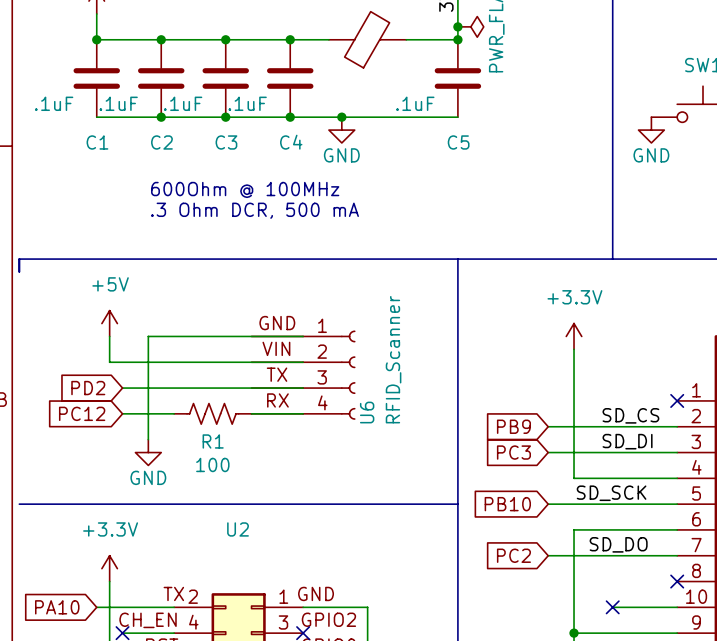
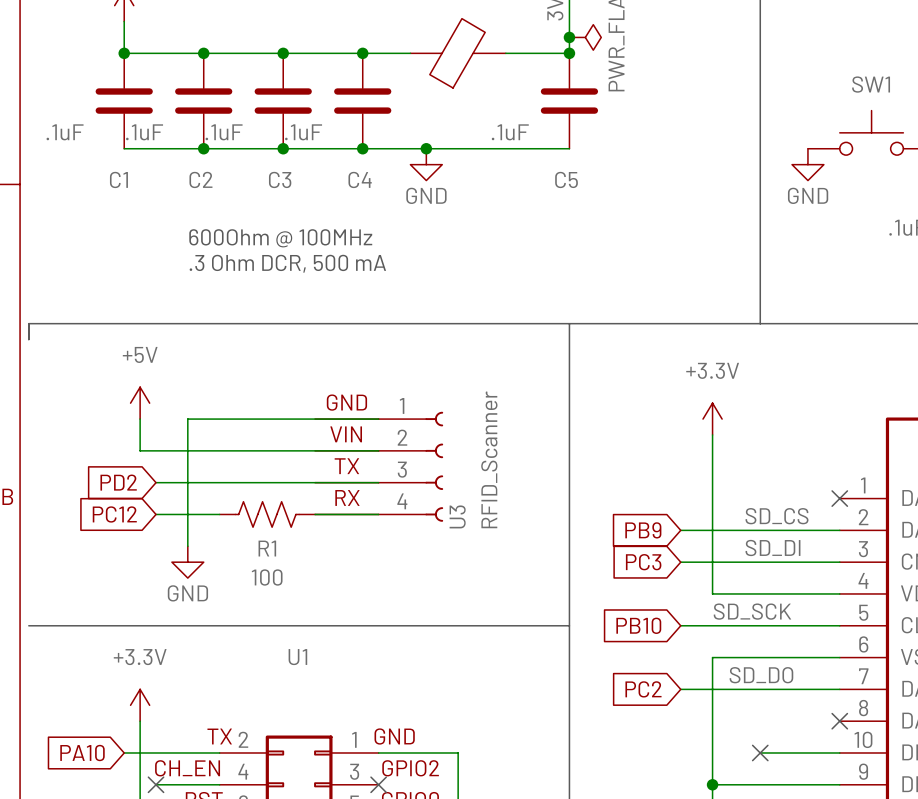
U6 name: U6 (367, 412) -> U3 (457, 516)
U2 name: U2 (238, 529) -> U1 (297, 657)

